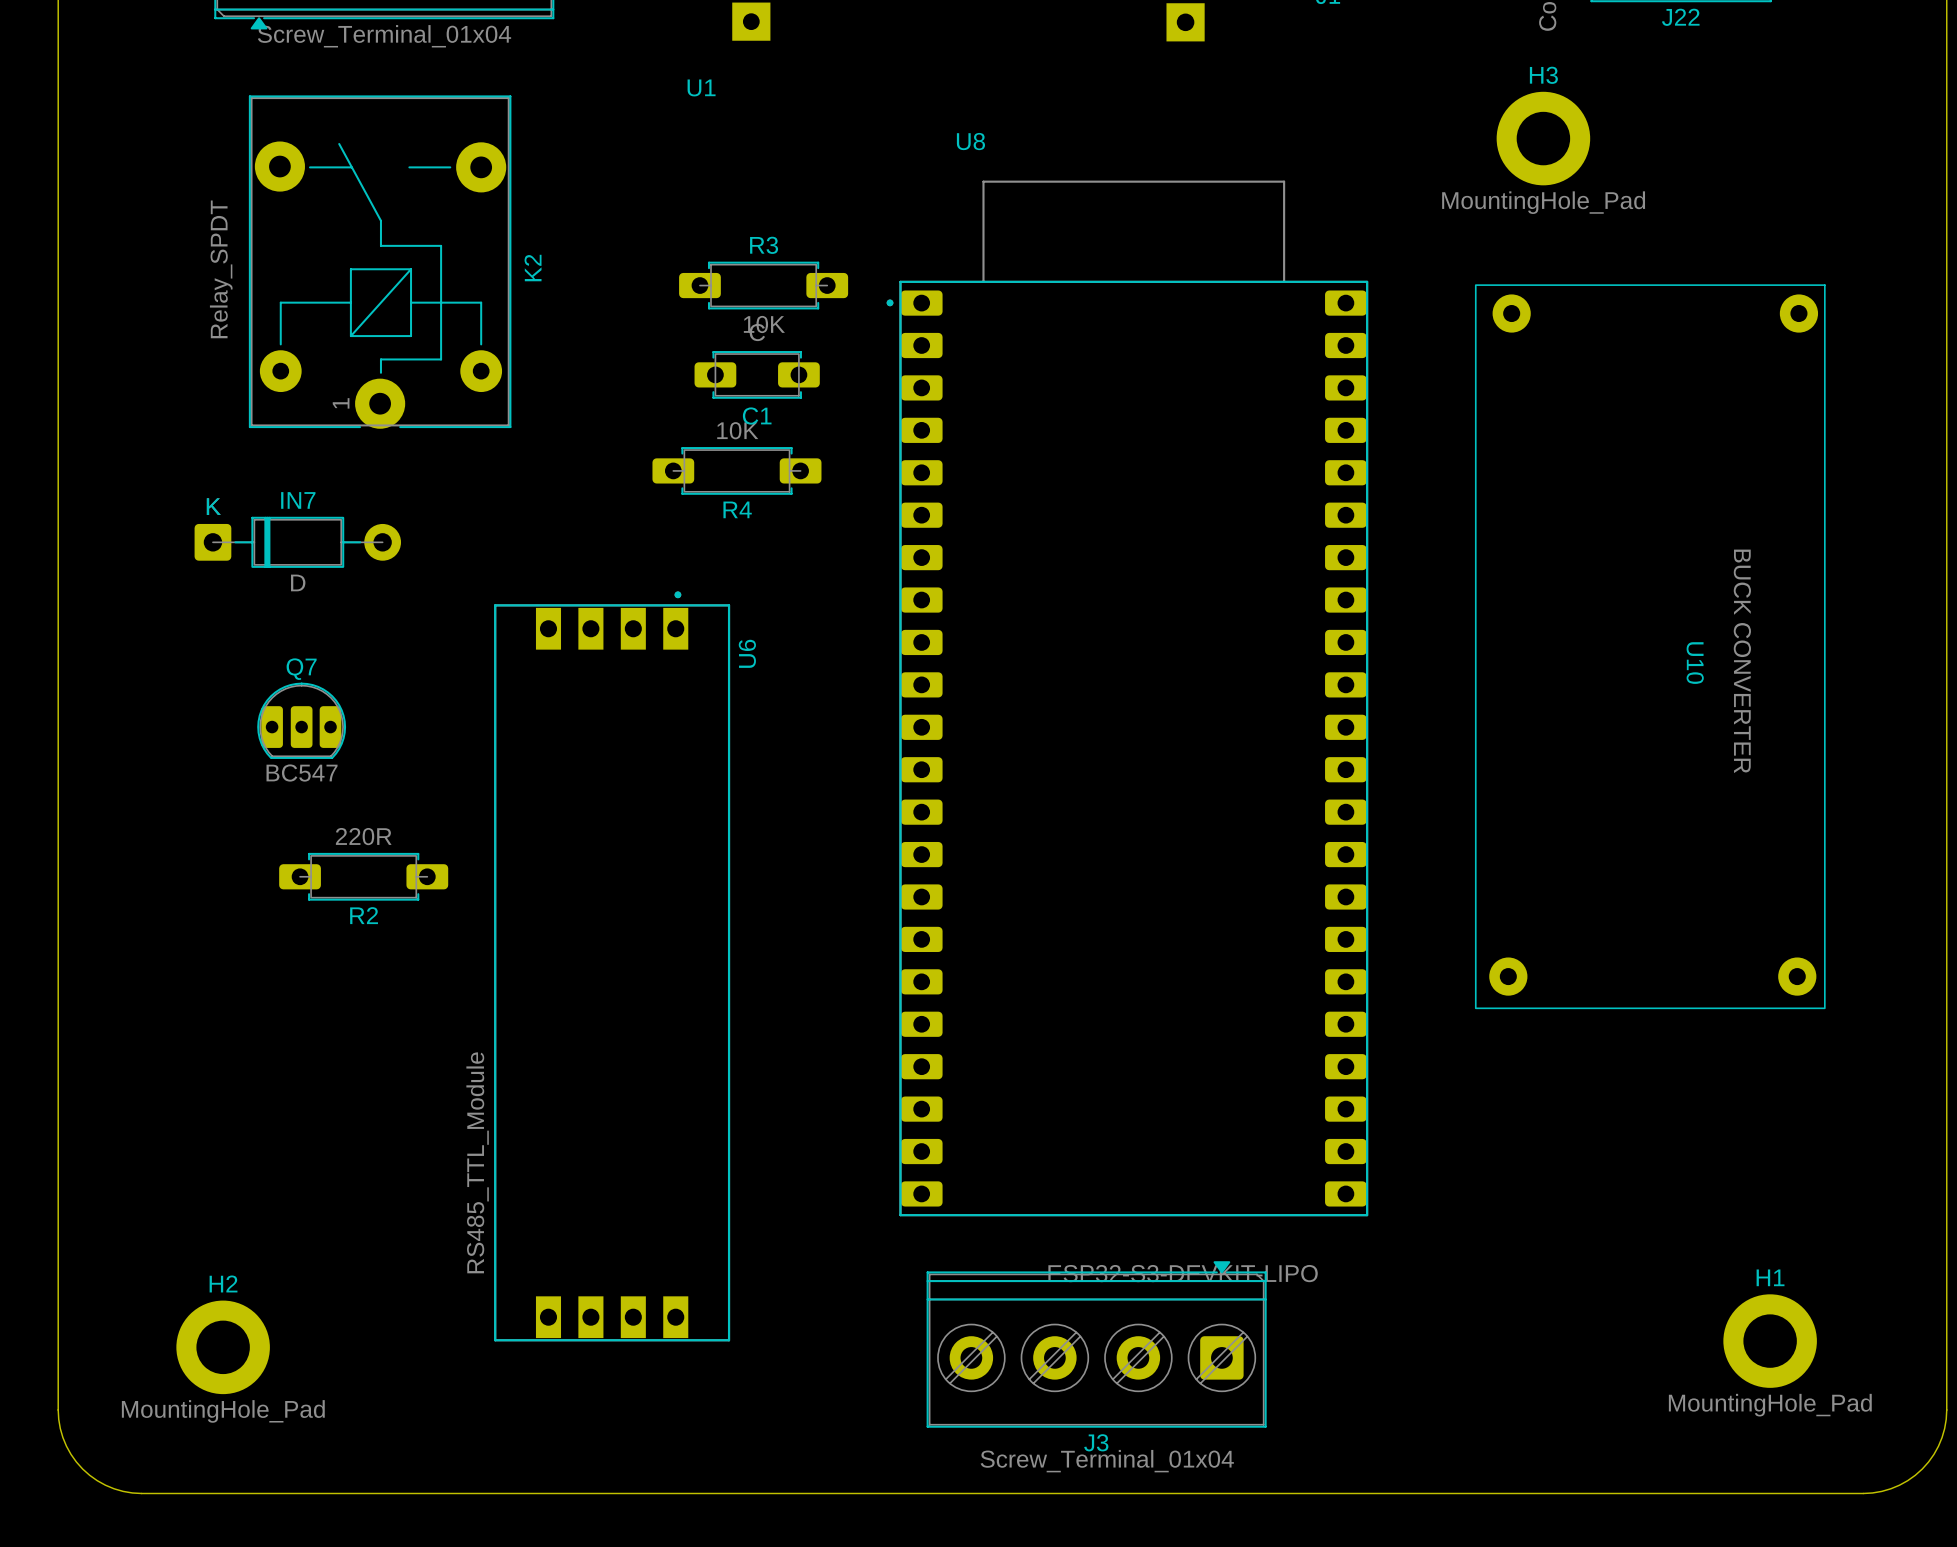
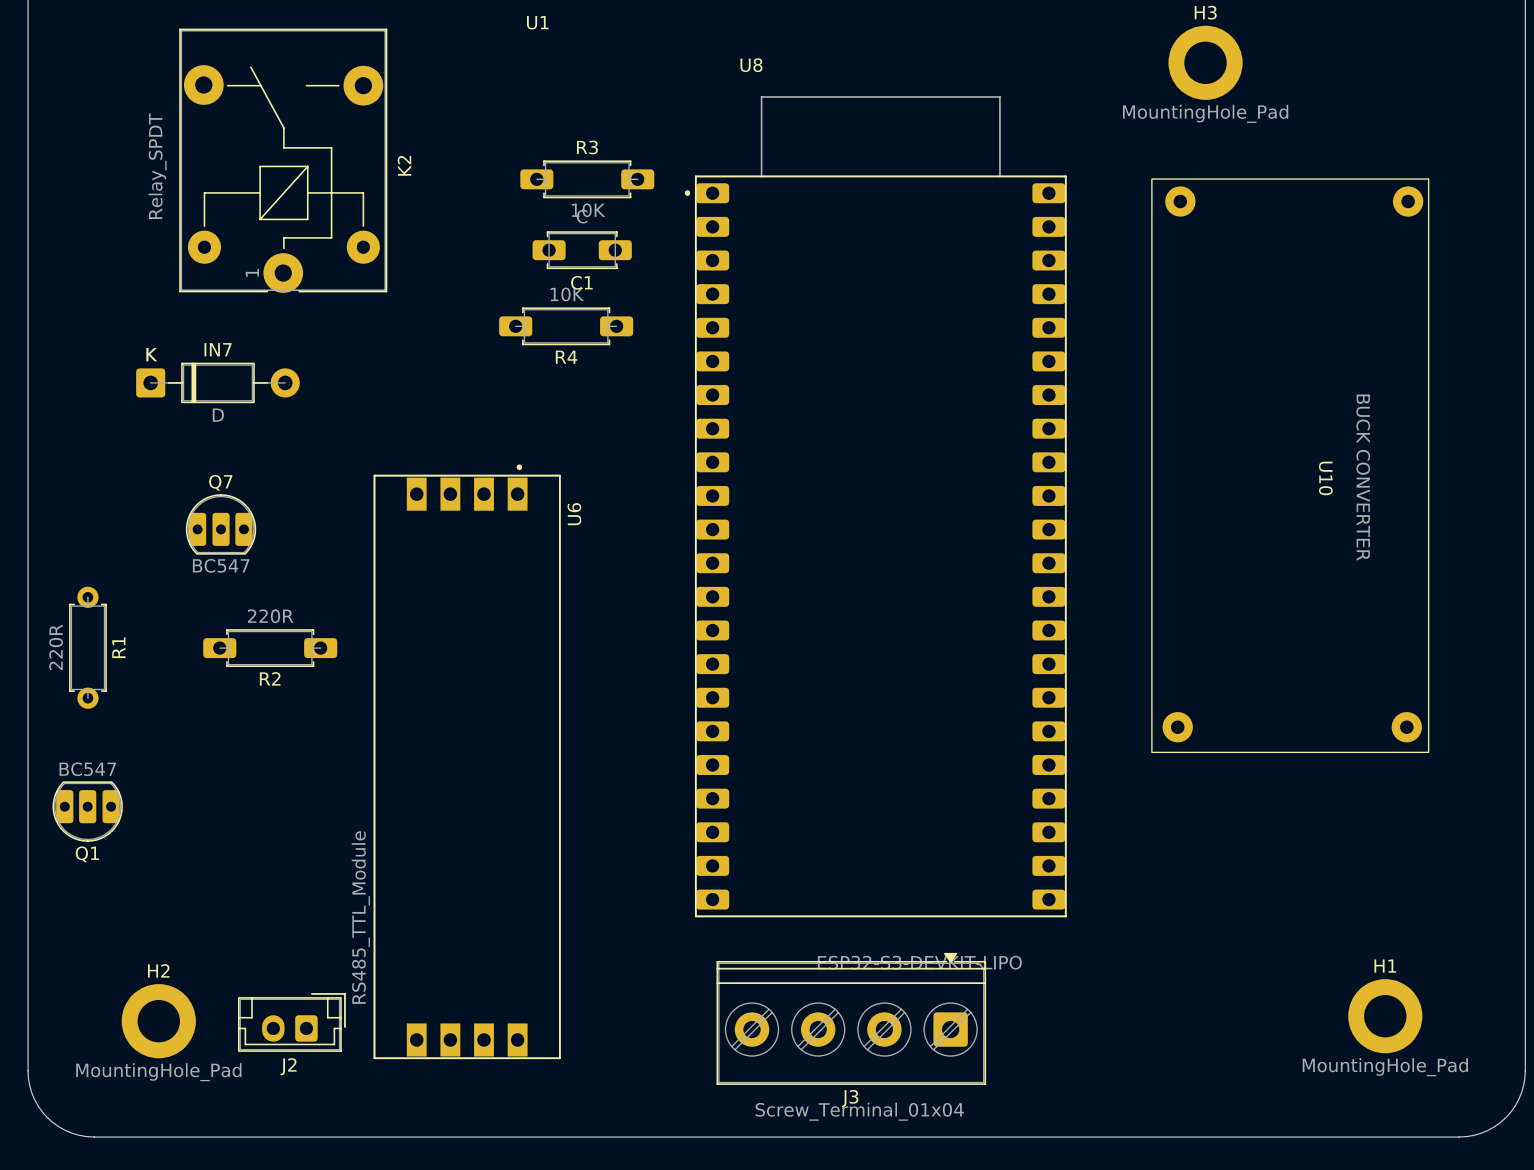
R1: none -> 220R (87, 647)
U6 position: (612, 966) -> (467, 761)
Q1: none -> BC547 (87, 811)
J2: none -> (291, 1022)

